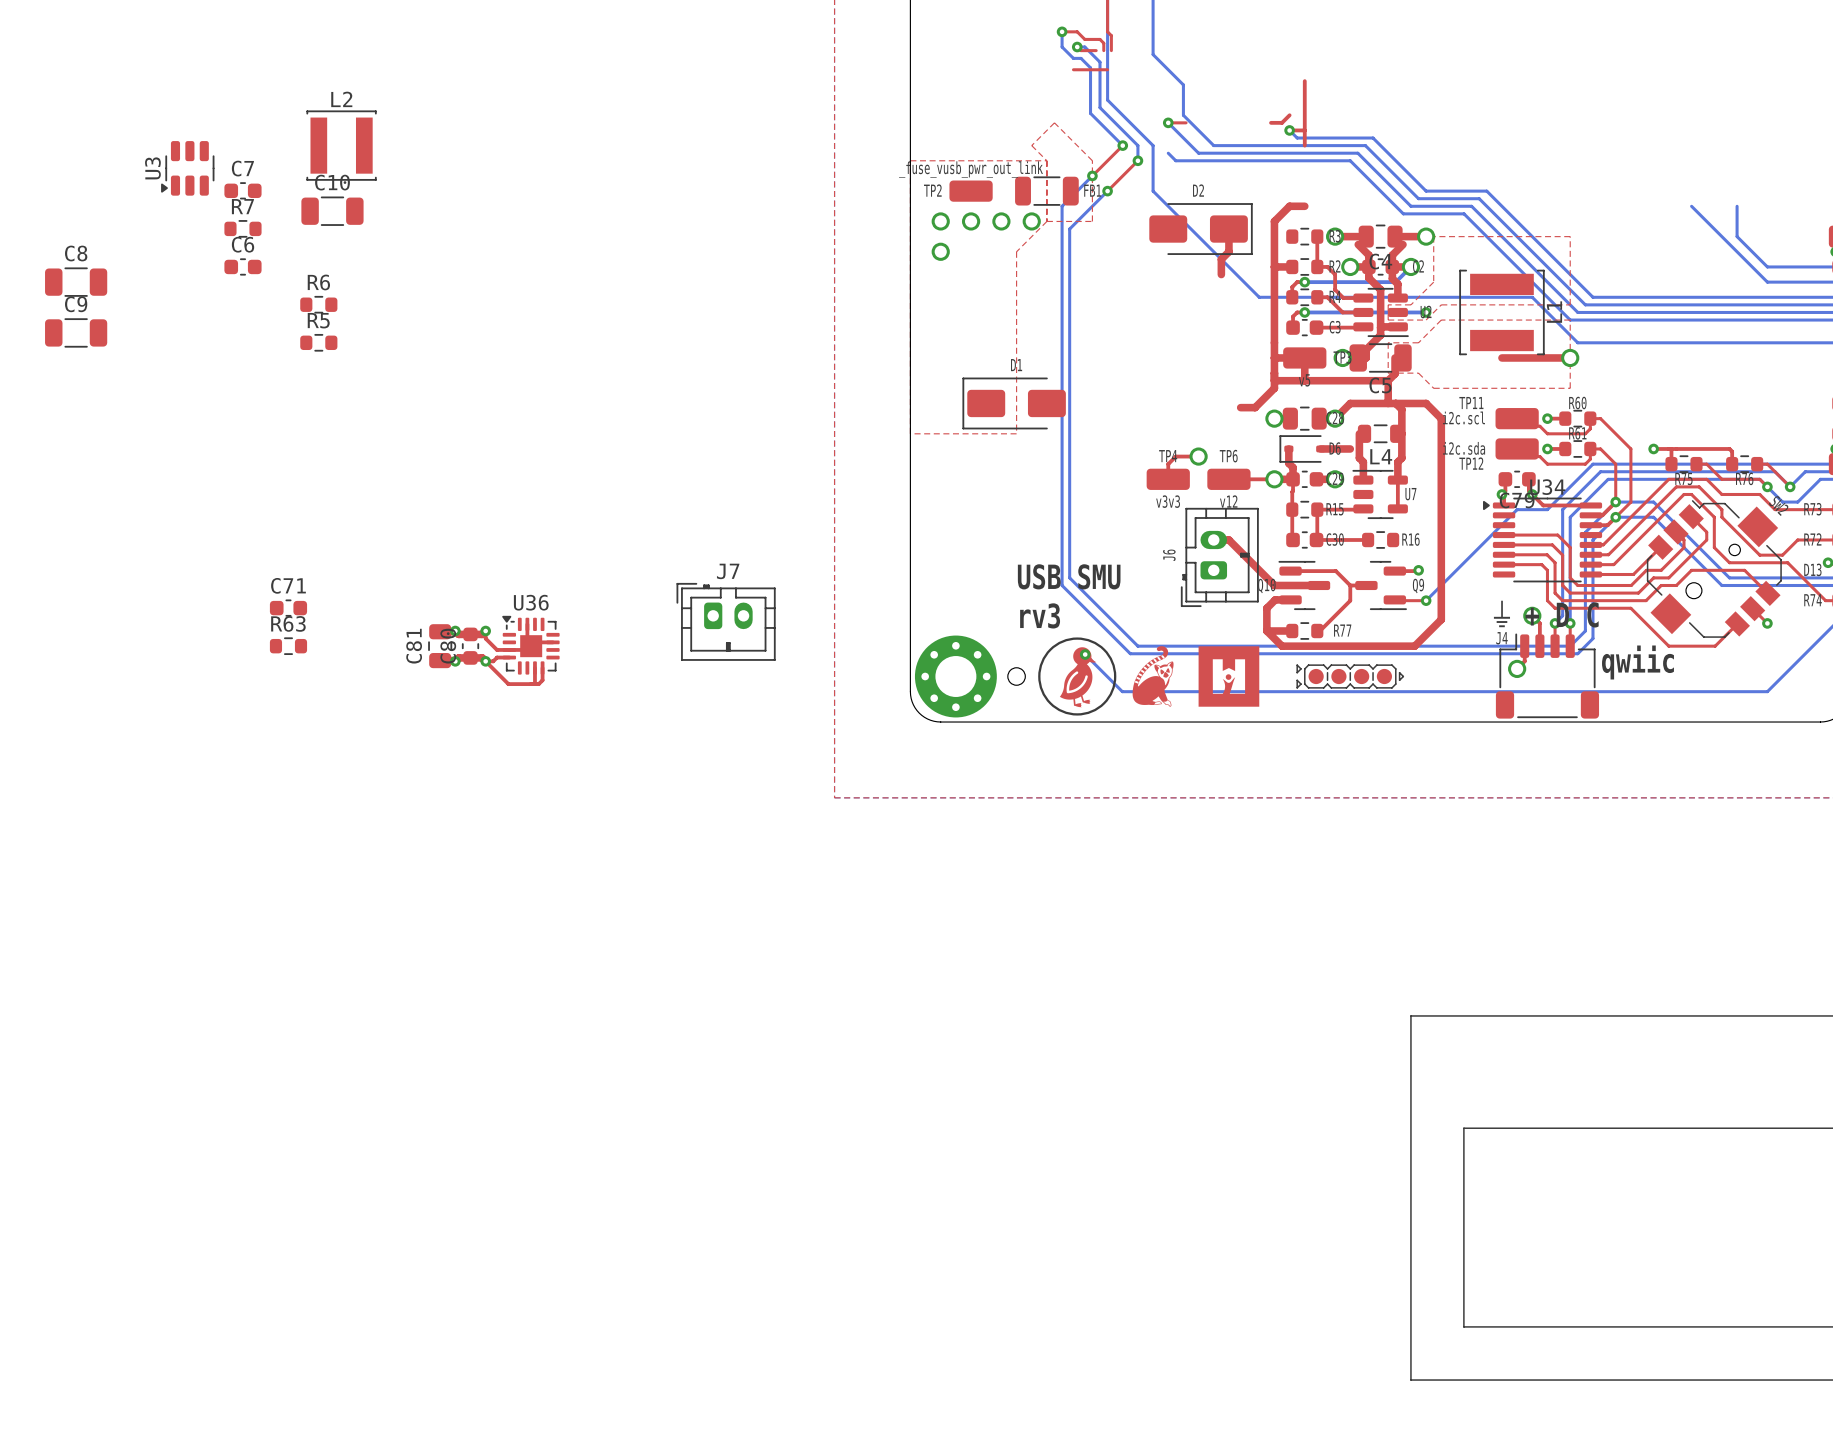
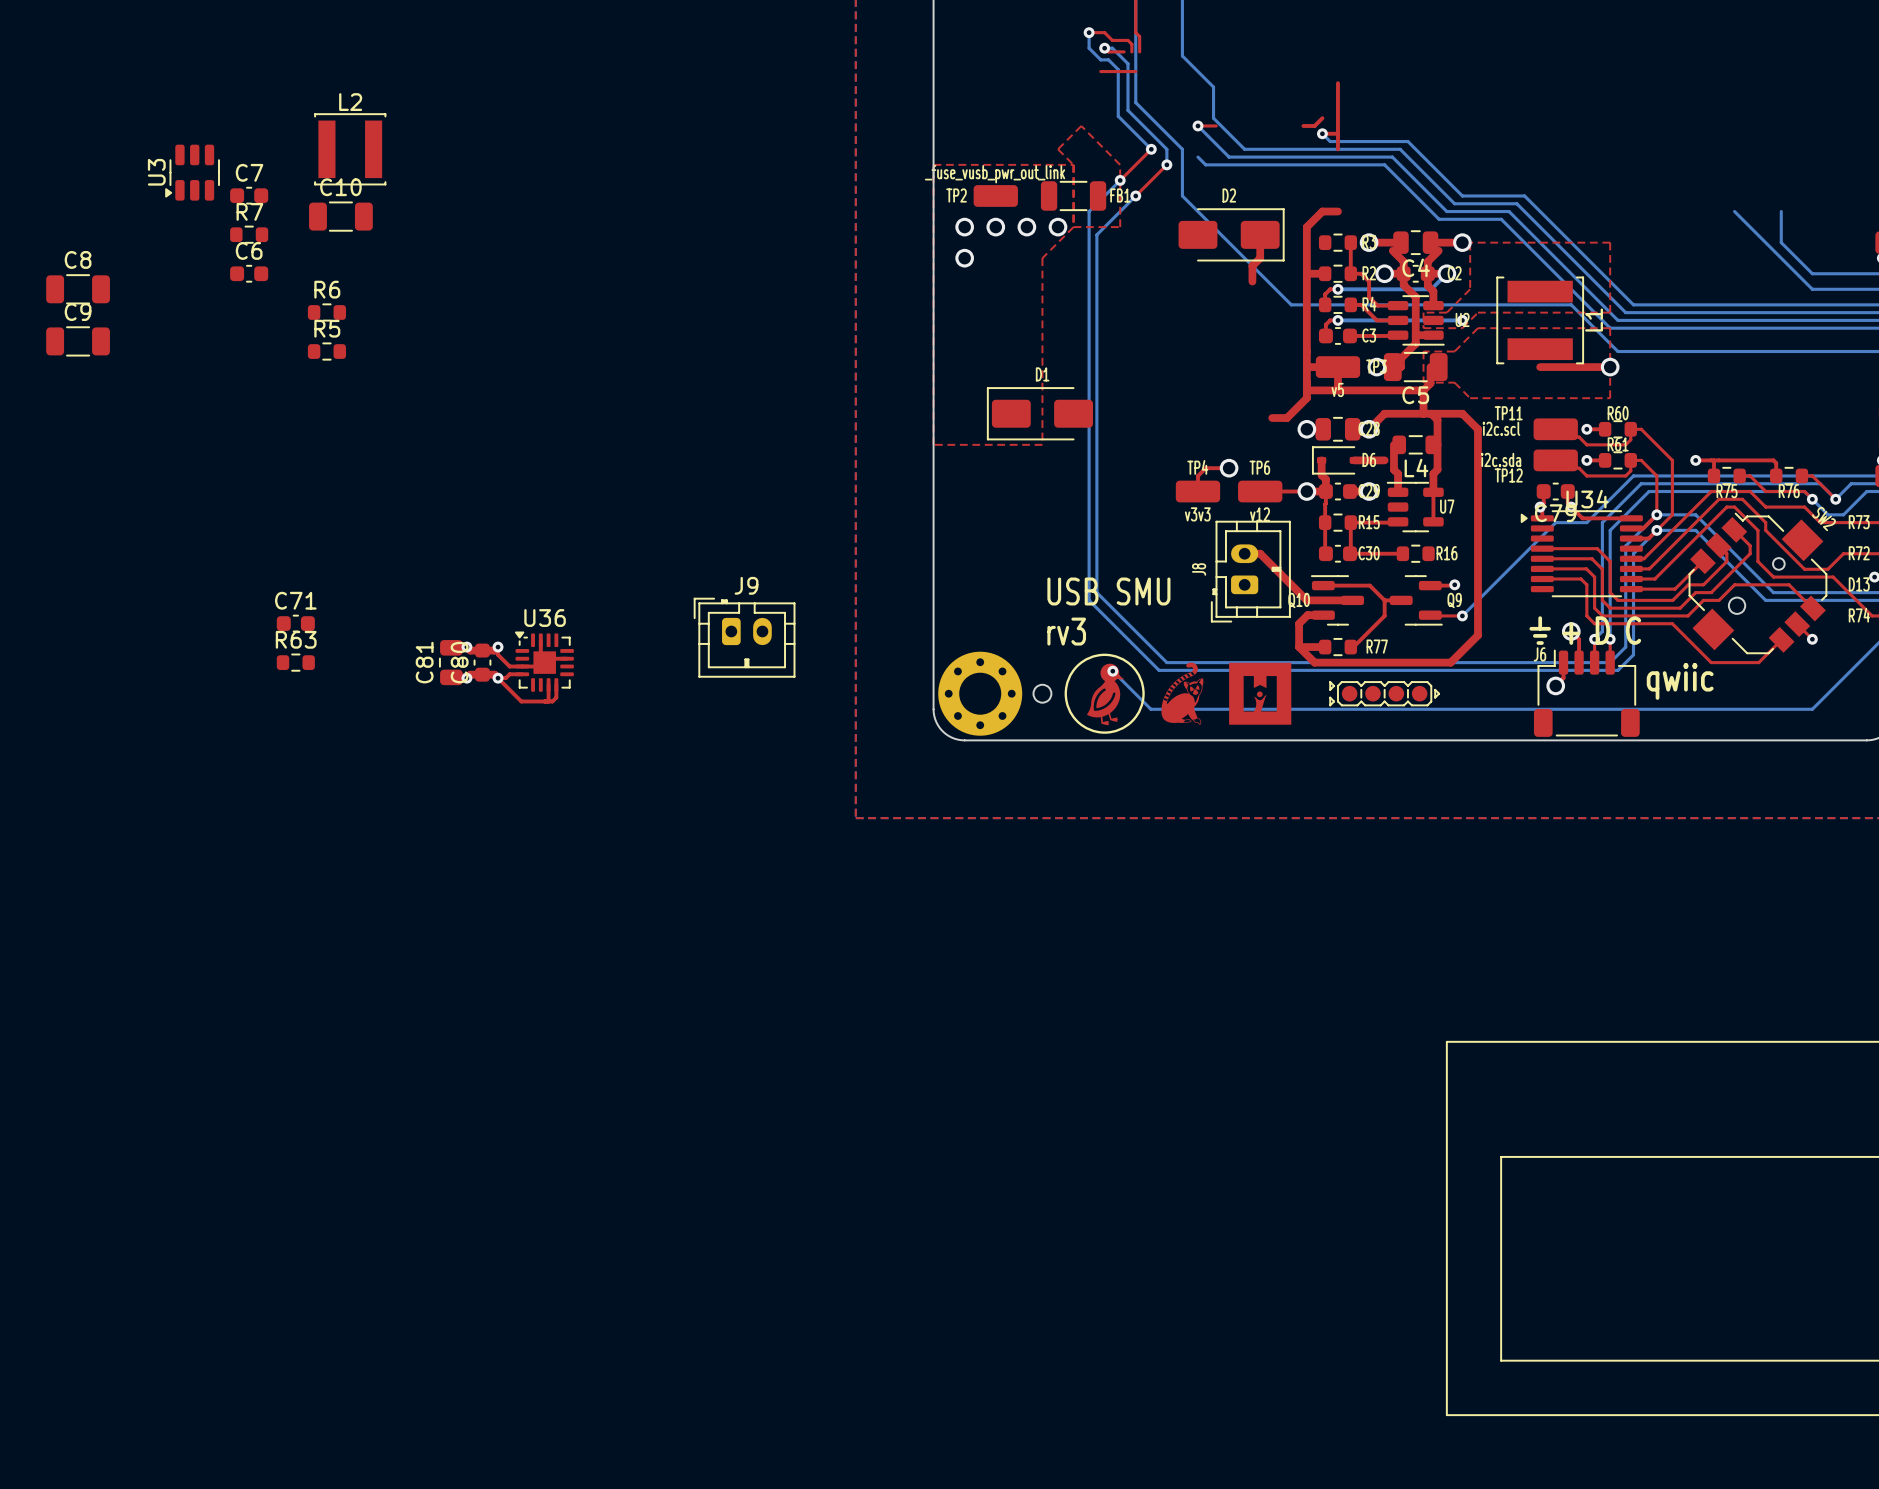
J6 name: J6 (1169, 555) -> J8 (1199, 569)
J7 name: J7 (728, 571) -> J9 (746, 585)
J4 name: J4 (1501, 638) -> J6 (1540, 654)

